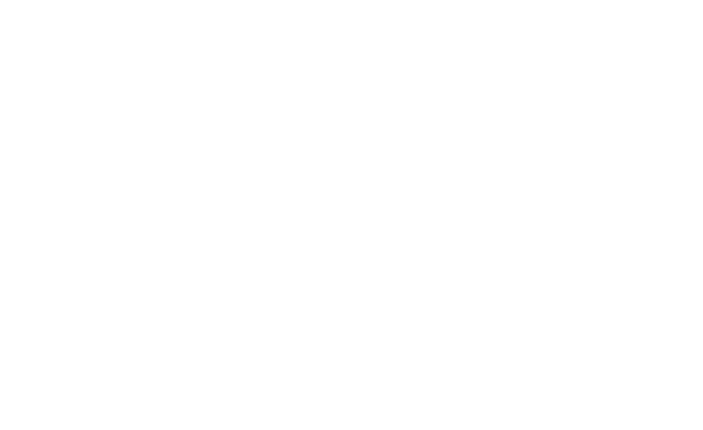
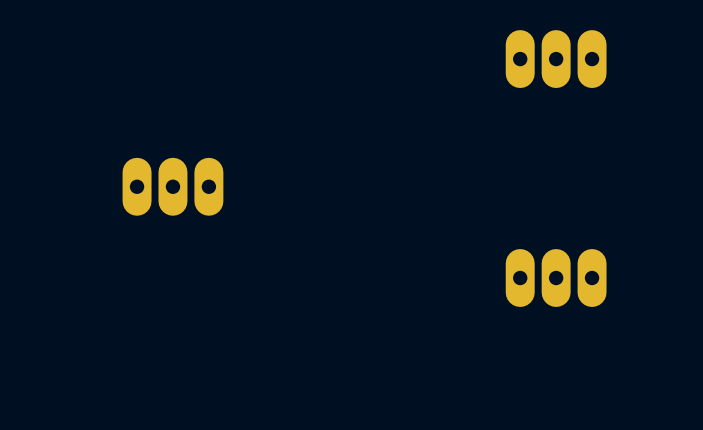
part: none -> (556, 59)
part: none -> (172, 186)
part: none -> (556, 278)

